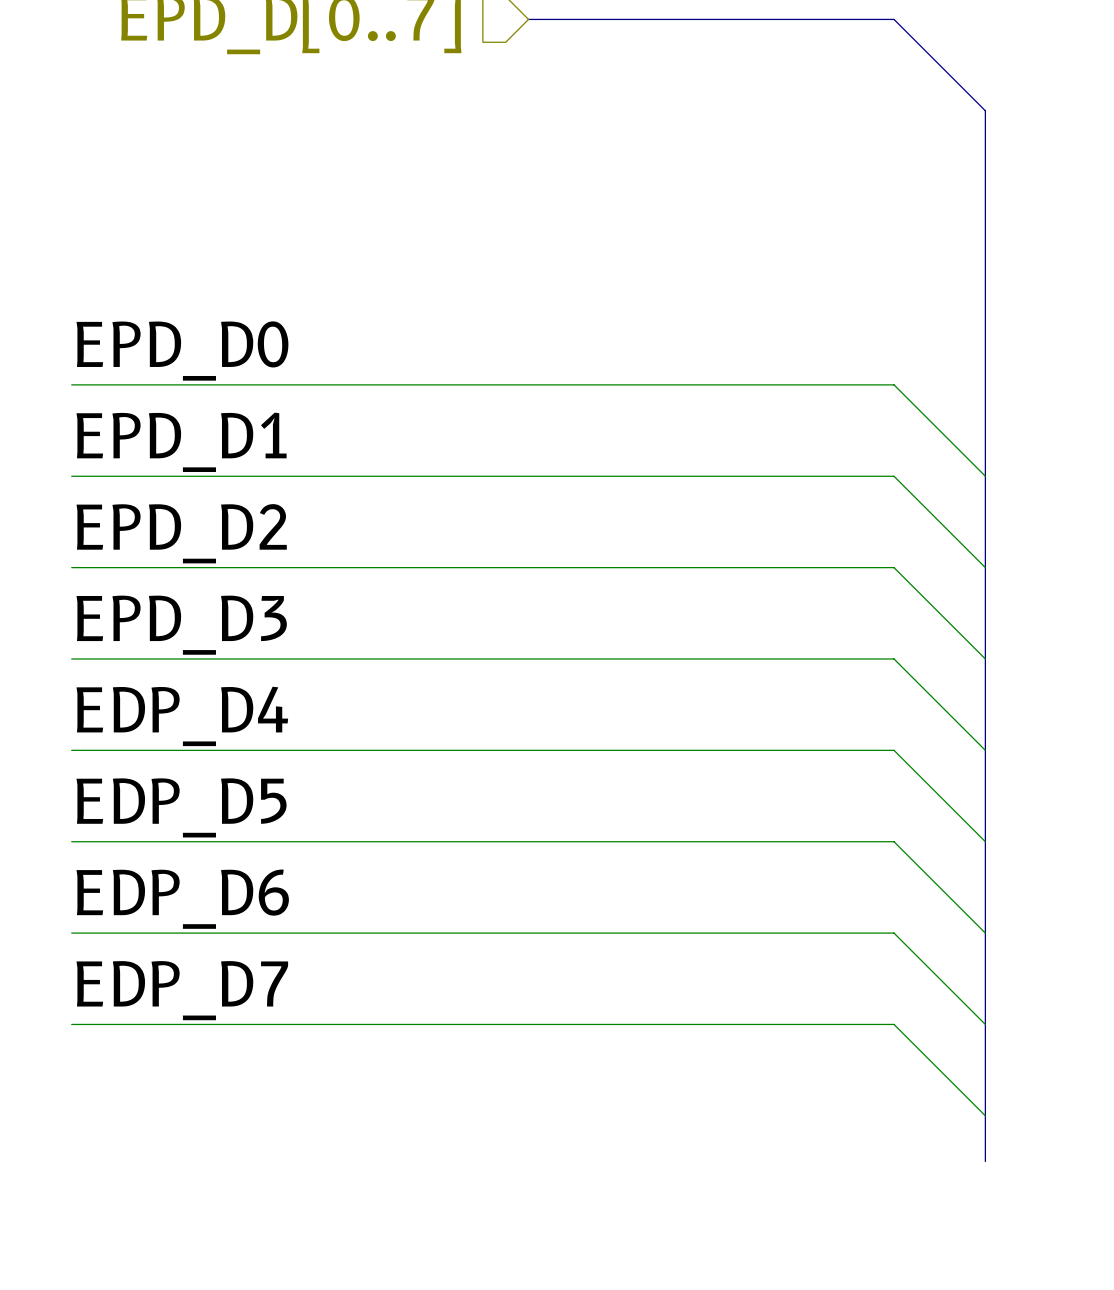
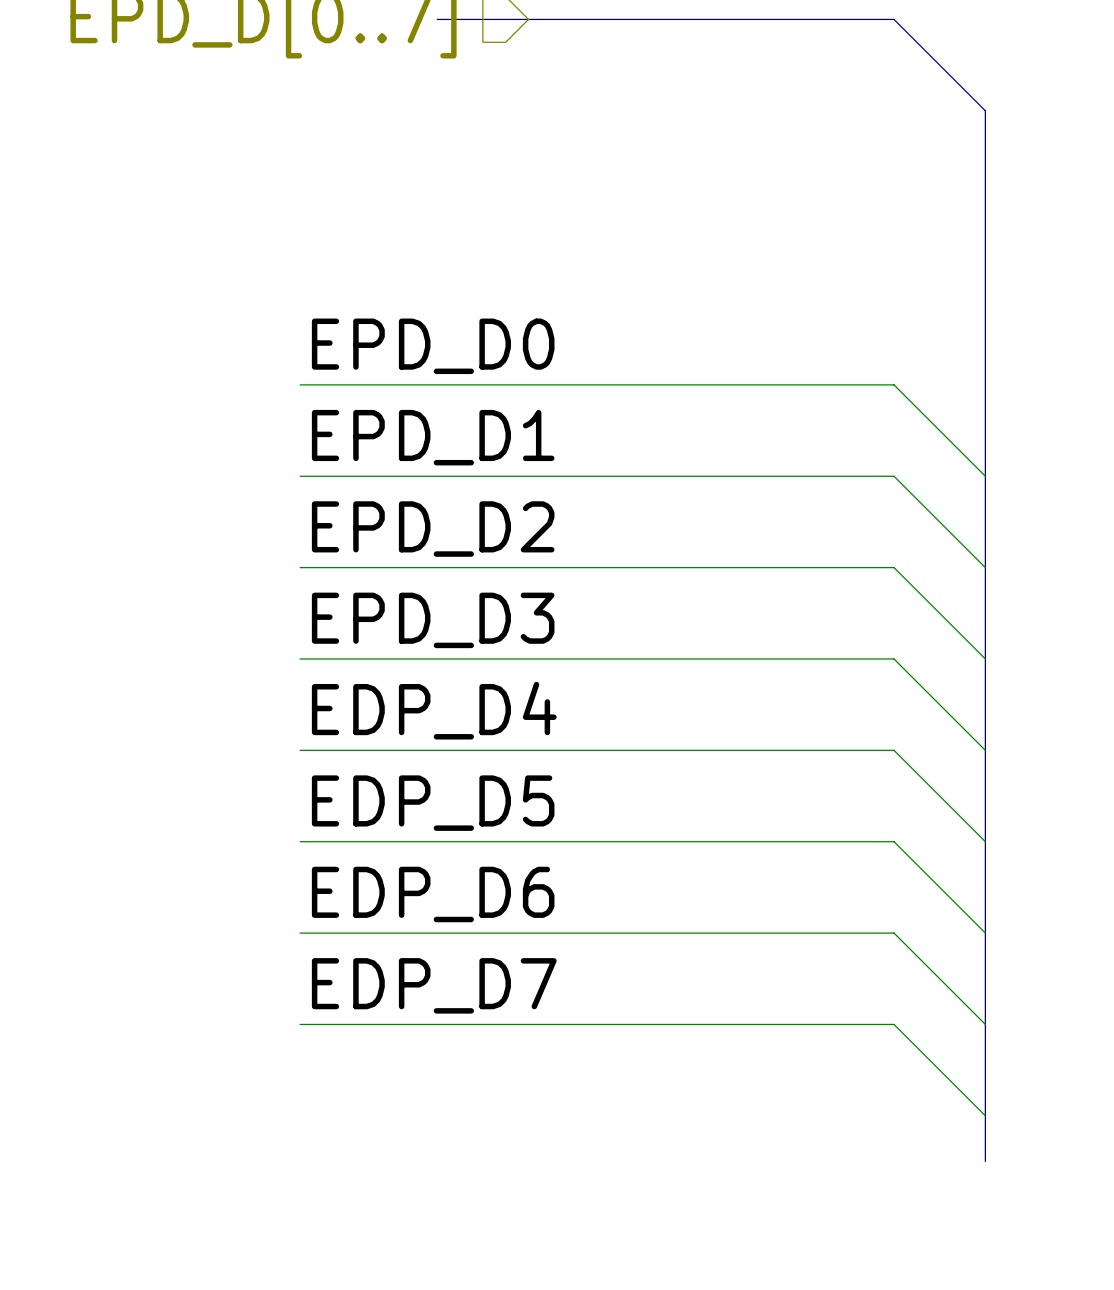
bus: none -> (437, 19) (528, 19)
label position: EPD_D0 (182, 351) -> EPD_D0 (433, 346)
wire: (71, 384) (300, 384) -> none
label position: EPD_D1 (181, 442) -> EPD_D1 (433, 437)
wire: (71, 476) (300, 476) -> none
label position: EPD_D2 (181, 533) -> EPD_D2 (433, 529)
wire: (71, 567) (300, 567) -> none
label position: EPD_D3 (181, 625) -> EPD_D3 (433, 620)
wire: (71, 658) (300, 658) -> none
label position: EDP_D4 (182, 716) -> EDP_D4 (434, 710)
wire: (71, 750) (300, 750) -> none
label position: EDP_D5 (181, 807) -> EDP_D5 (433, 803)
wire: (71, 841) (300, 841) -> none
label position: EDP_D6 (182, 899) -> EDP_D6 (433, 894)
wire: (71, 933) (300, 933) -> none
label position: EDP_D7 (182, 990) -> EDP_D7 (434, 985)
wire: (71, 1024) (300, 1024) -> none

